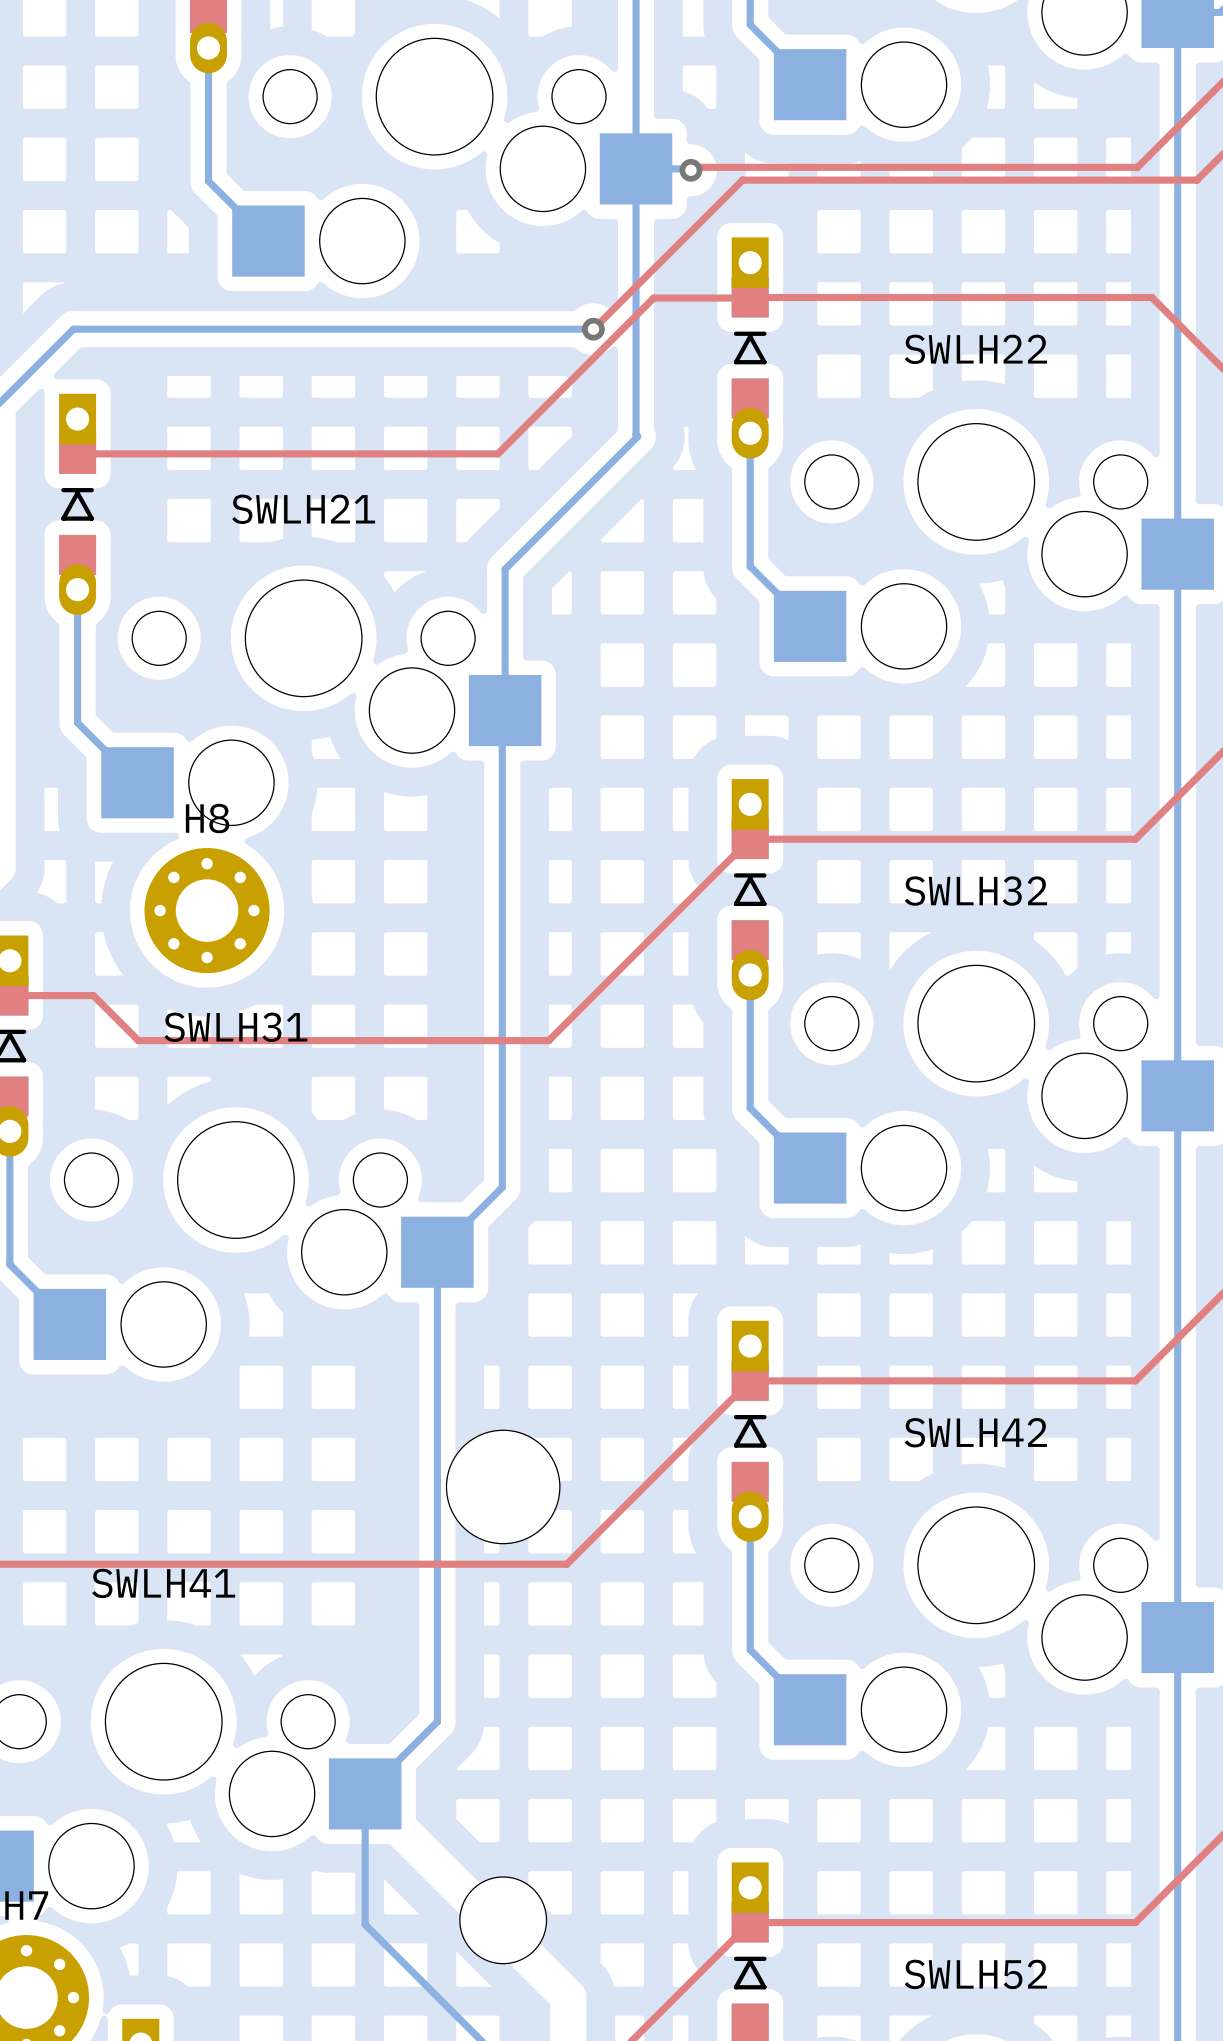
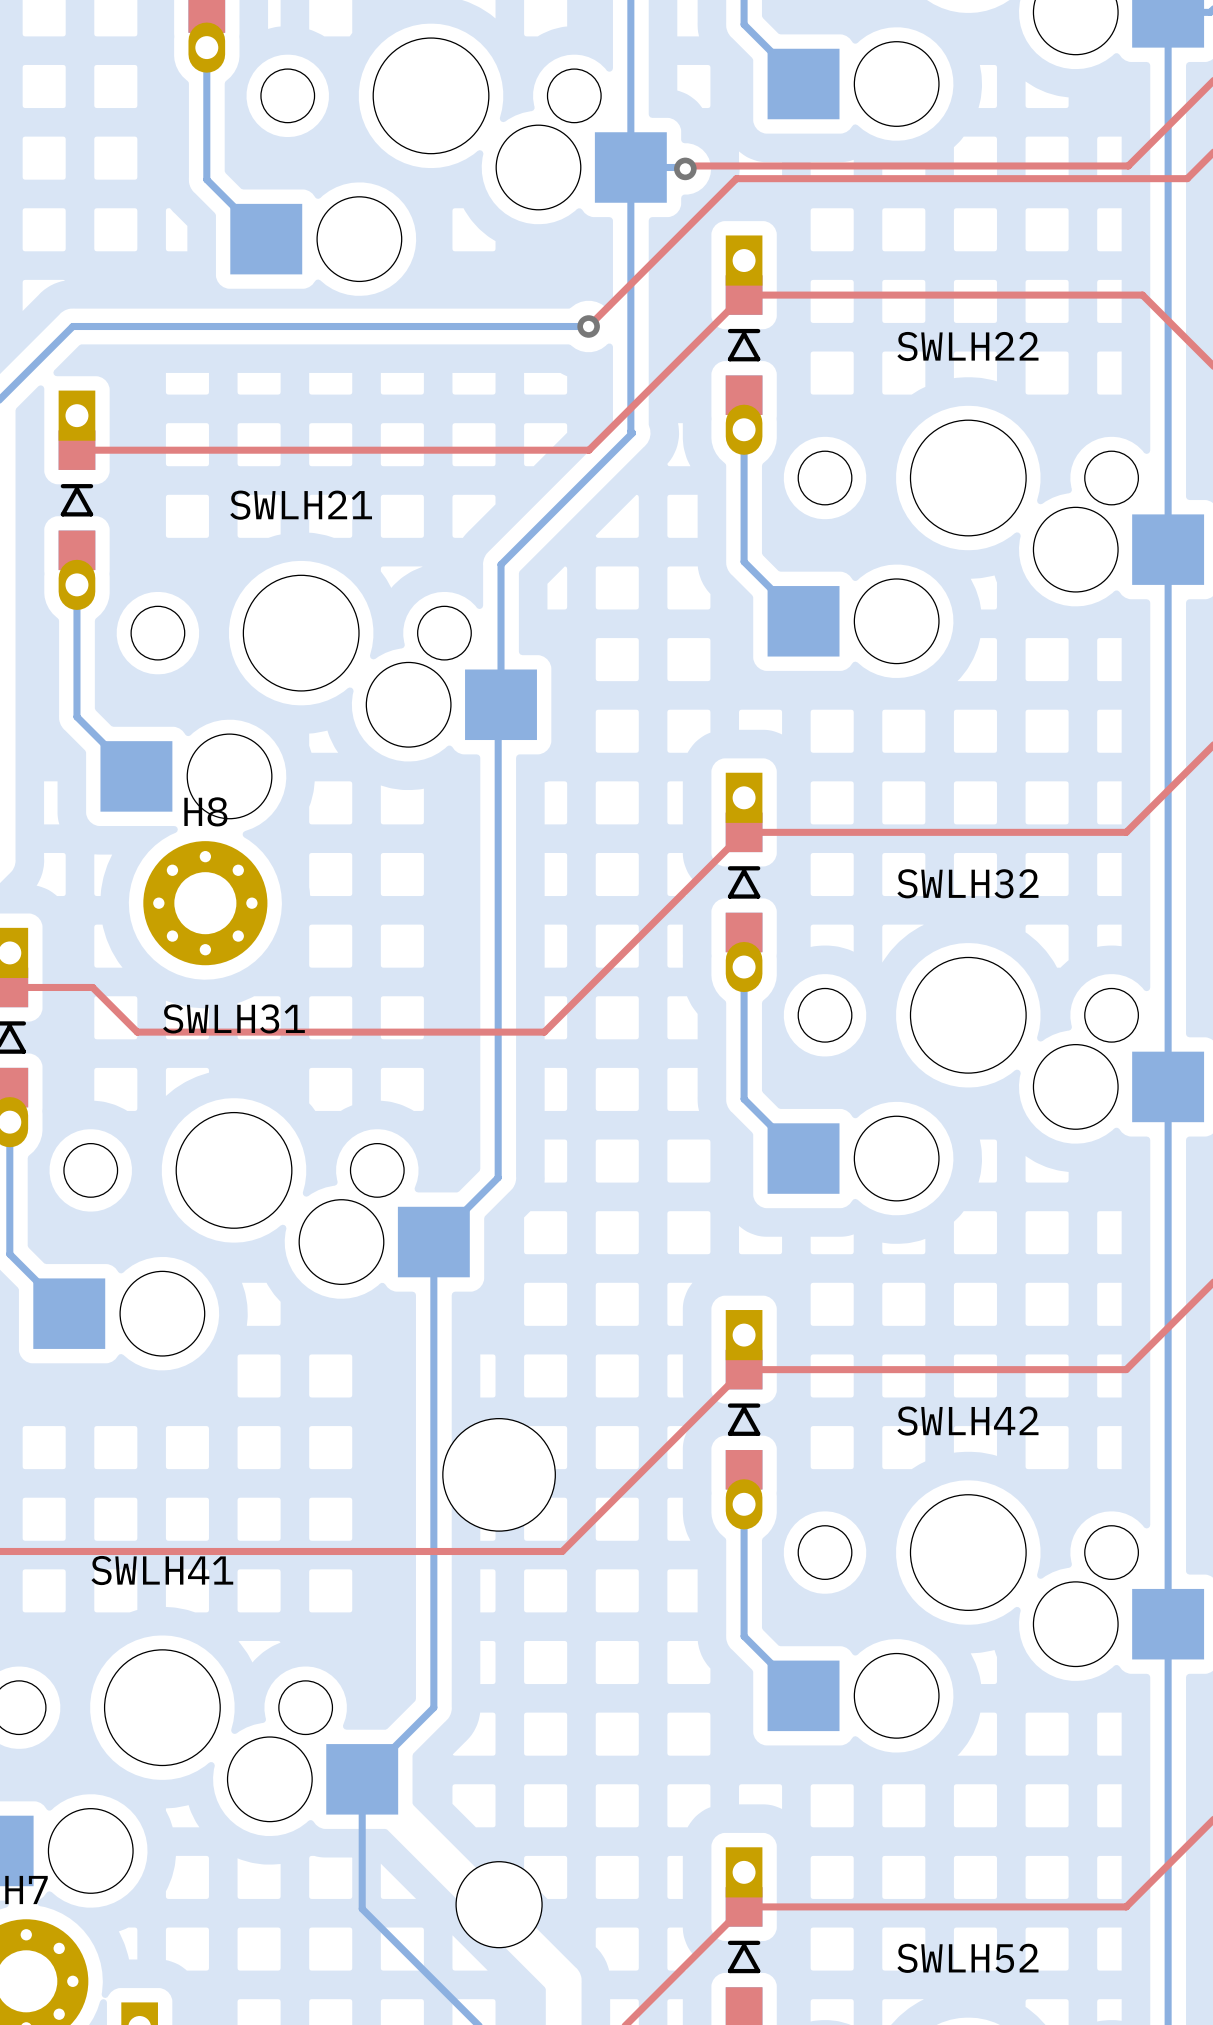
top track: (749, 298) (653, 298) (497, 453) -> (743, 295) (588, 450) (493, 450)

